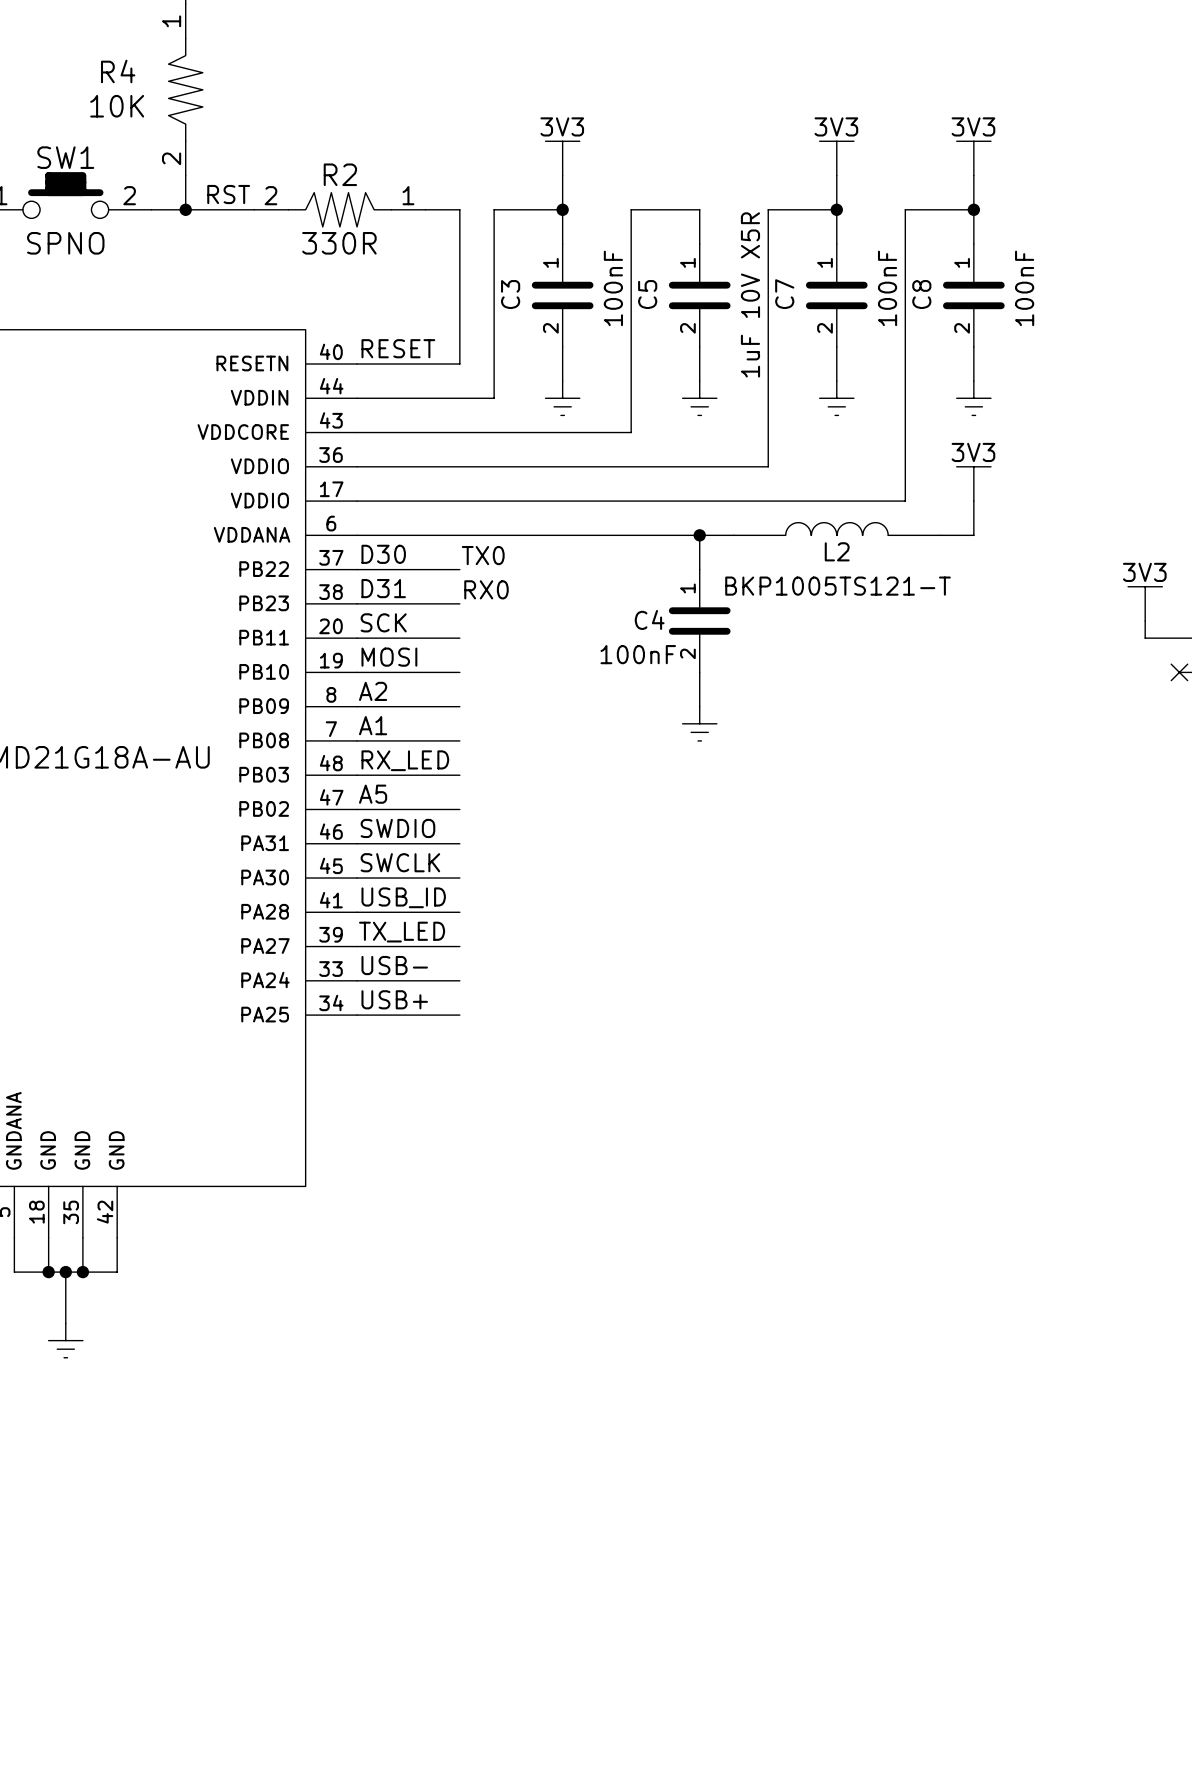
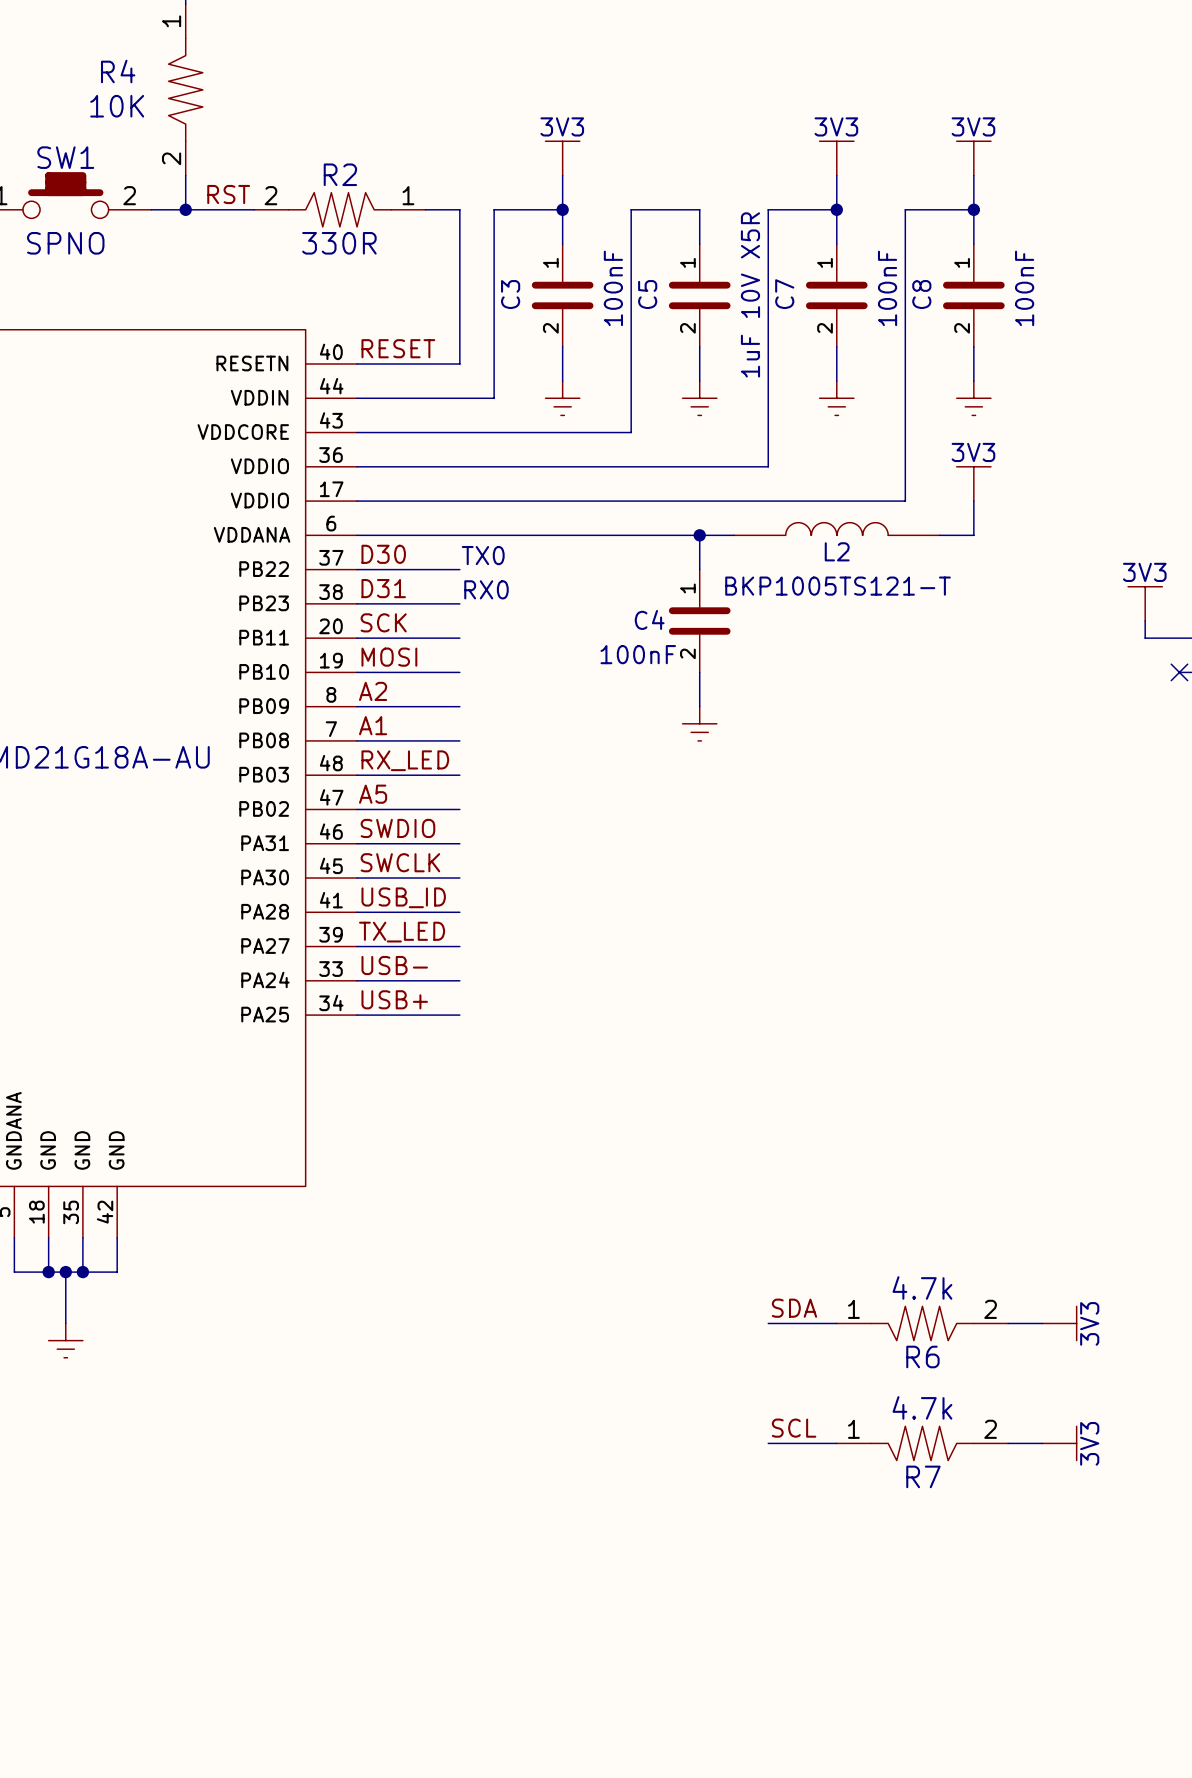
label: none -> SDA (794, 1308)
wire: none -> (768, 1323) (836, 1323)
R6: none -> 4.7k (922, 1323)
wire: none -> (1008, 1323) (1042, 1323)
power symbol: none -> 3V3 (1059, 1323)
label: none -> SCL (794, 1428)
wire: none -> (768, 1443) (836, 1443)
R7: none -> 4.7k (922, 1443)
wire: none -> (1008, 1443) (1042, 1443)
power symbol: none -> 3V3 (1059, 1443)

